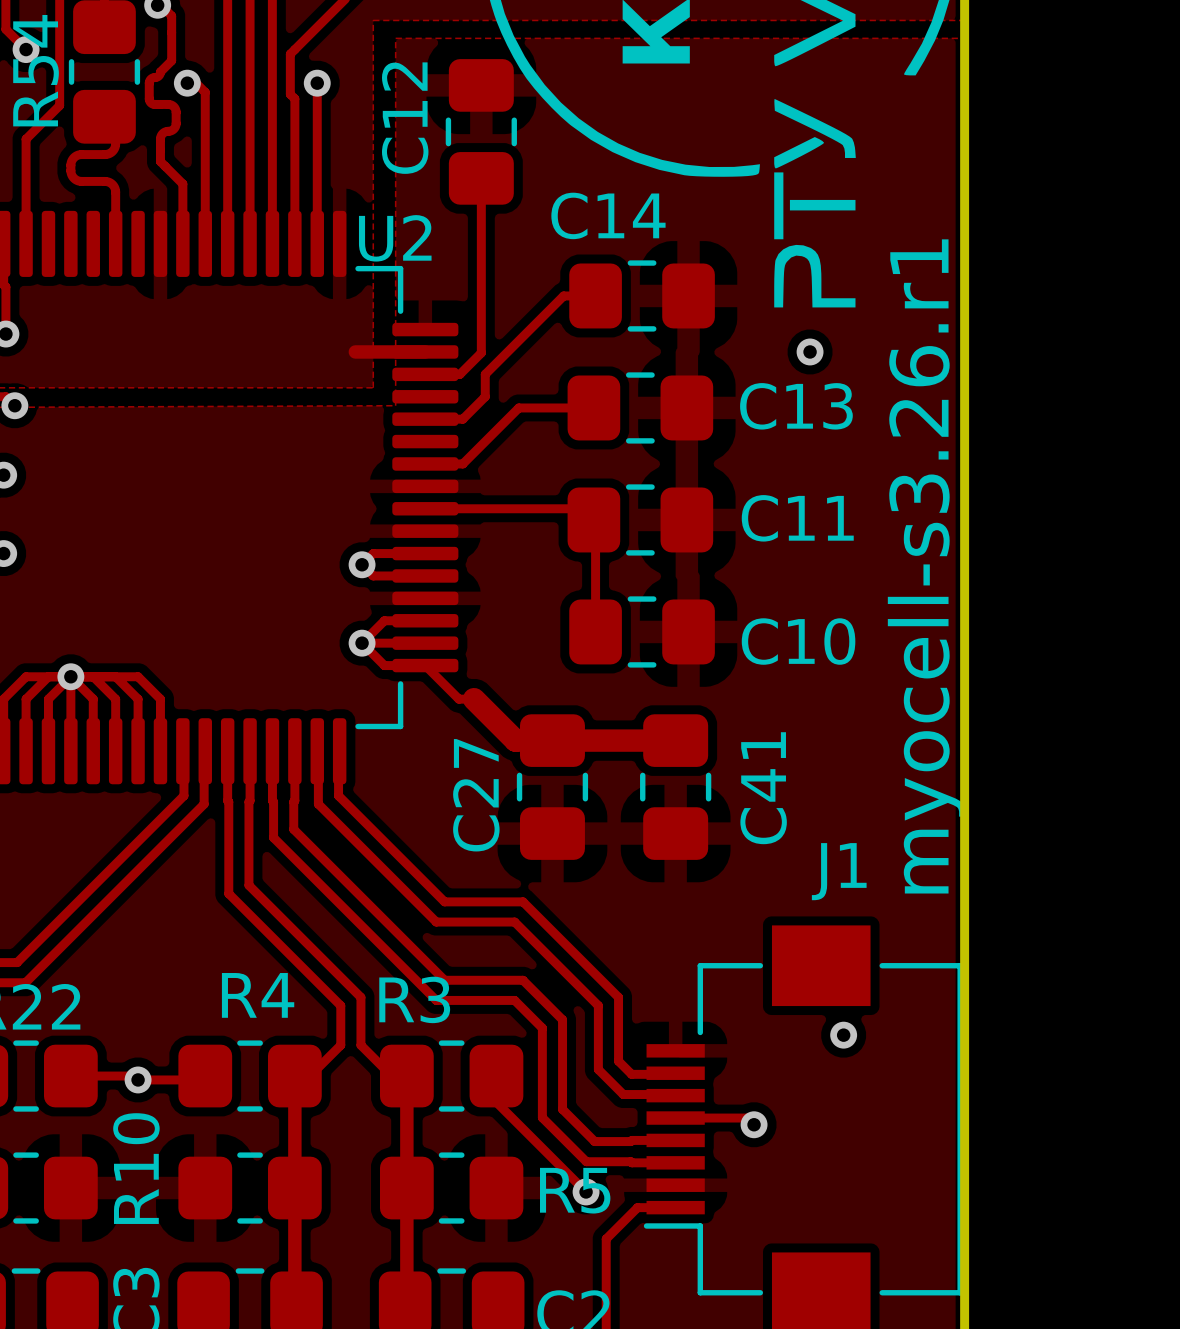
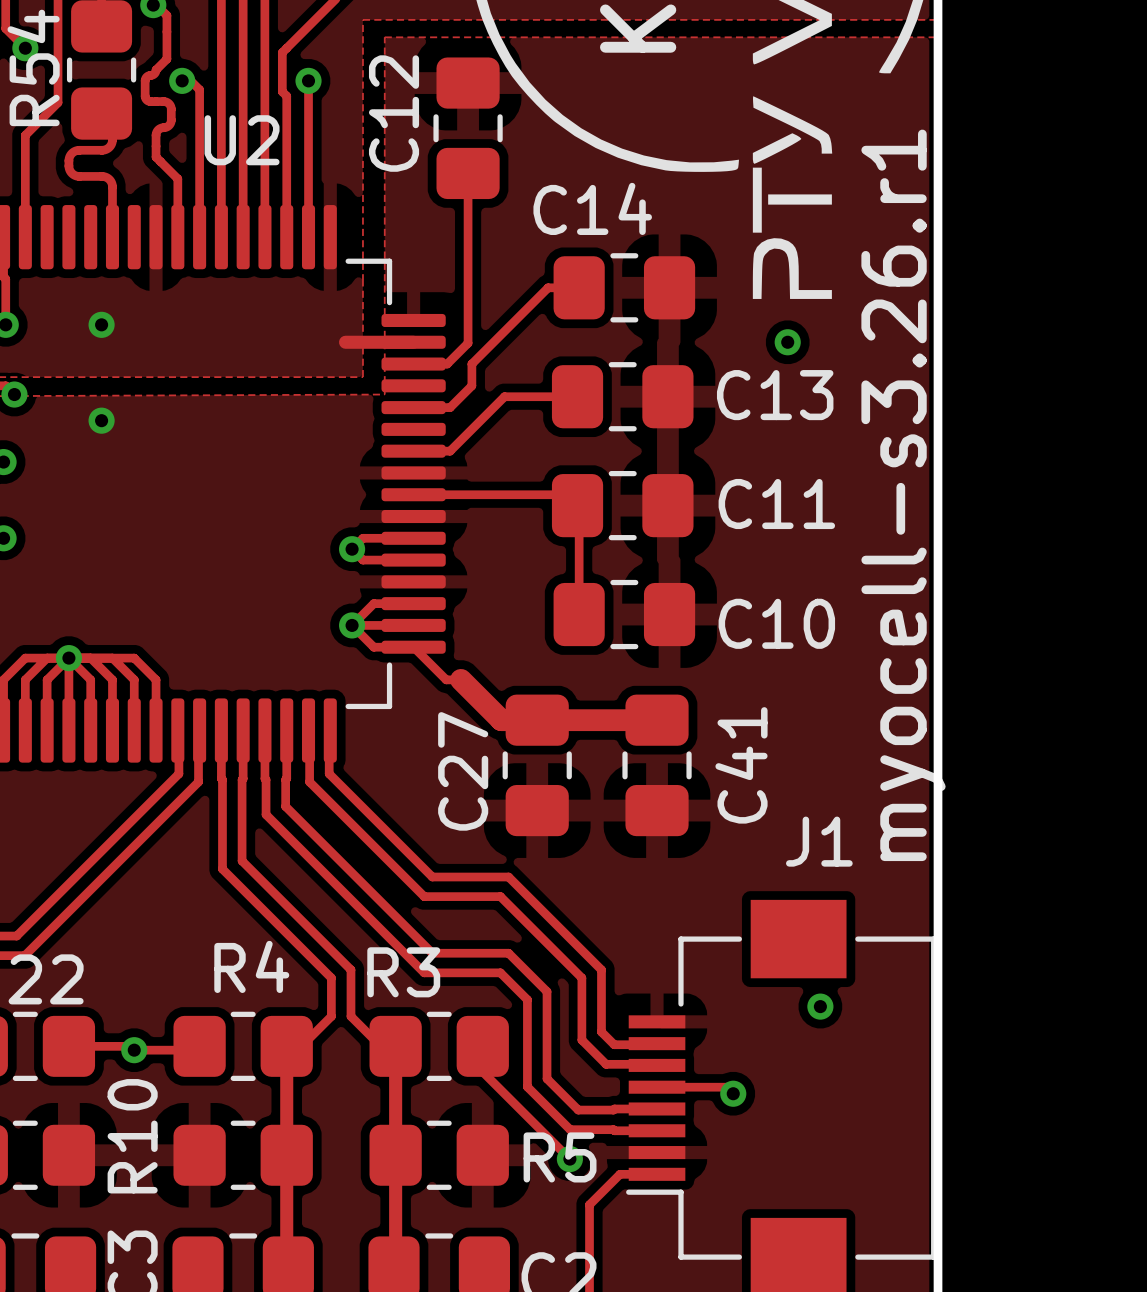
U2 name position: U2 (395, 238) -> U2 (242, 140)
via: none -> (101, 324)
via: none -> (101, 420)

